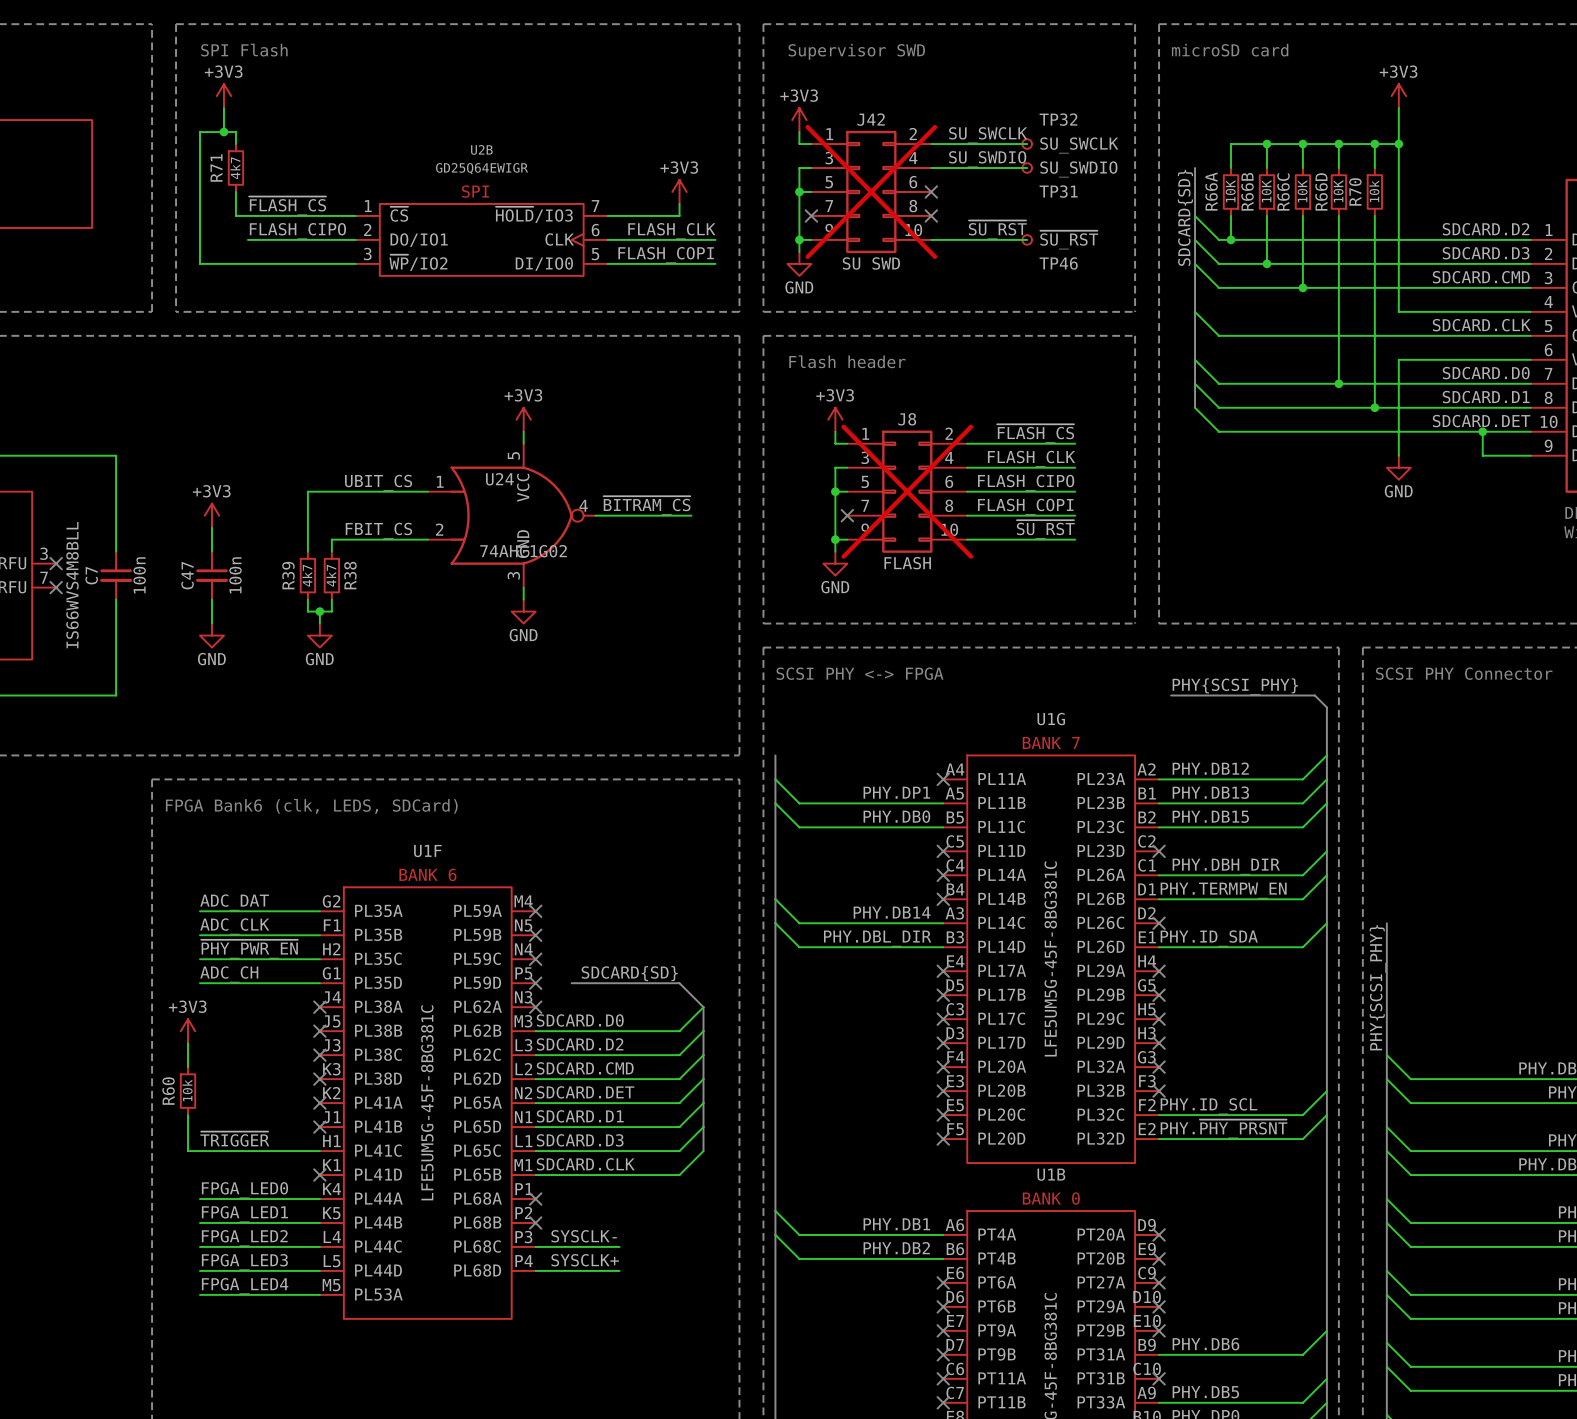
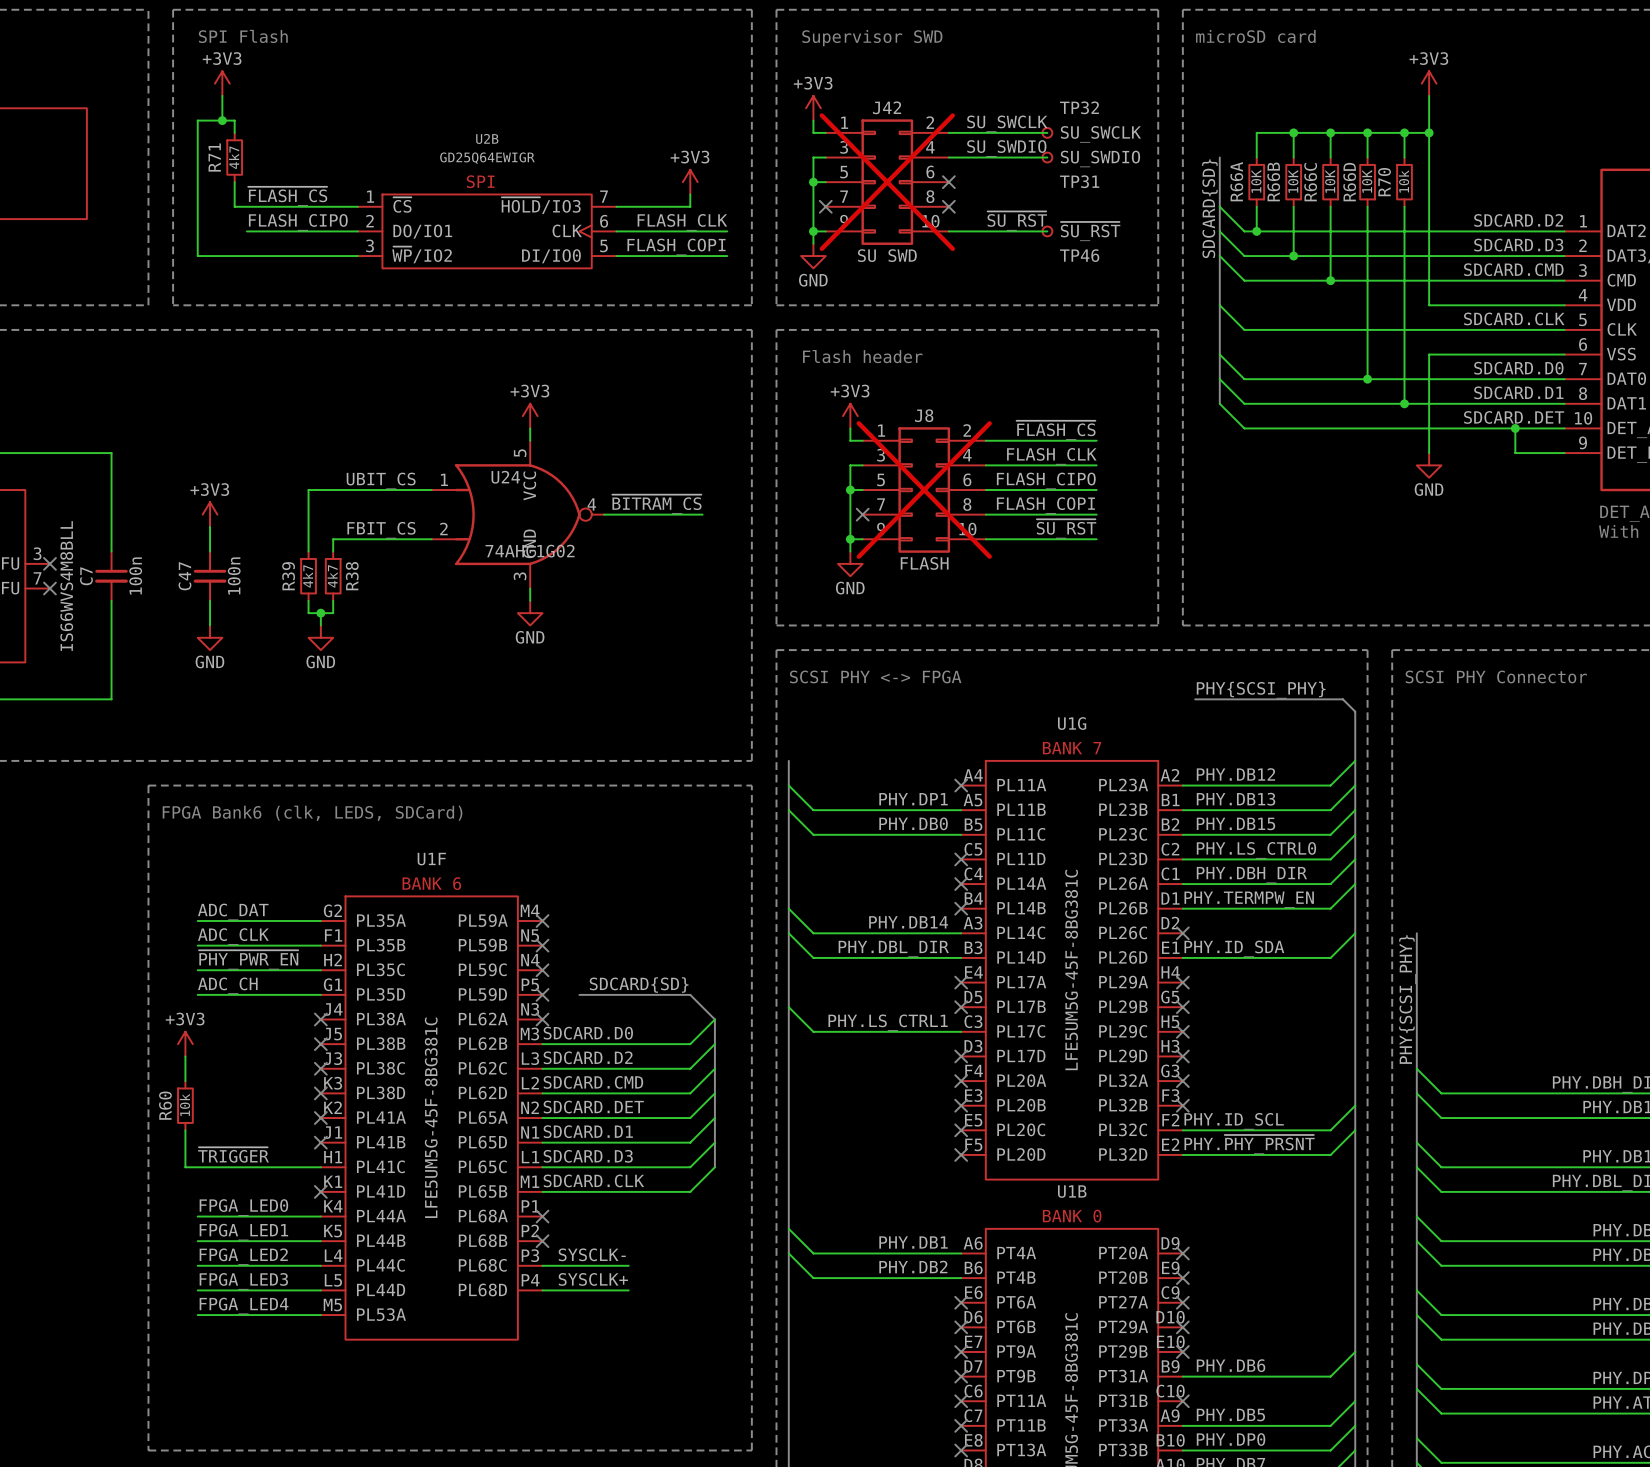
wire: none -> (1355, 834) (1330, 859) (1182, 859)
label: none -> PHY.LS_CTRL0 (1256, 850)
no-connect mark: (1159, 851) -> none
wire: none -> (788, 1007) (813, 1031) (961, 1031)
label: none -> PHY.LS_CTRL1 (888, 1022)
no-connect mark: (943, 1019) -> none

